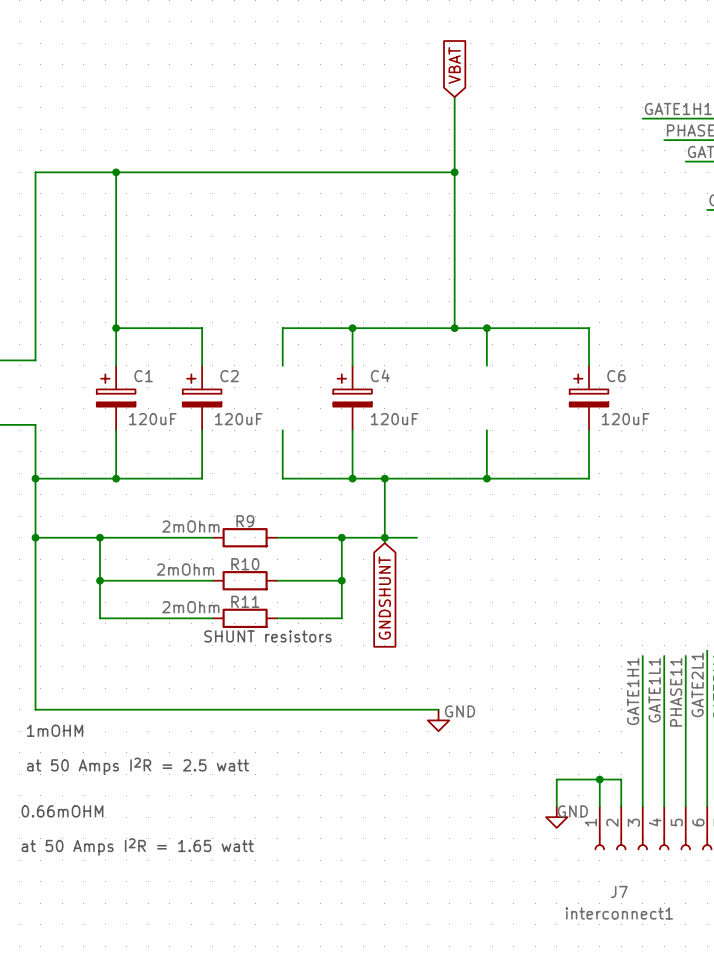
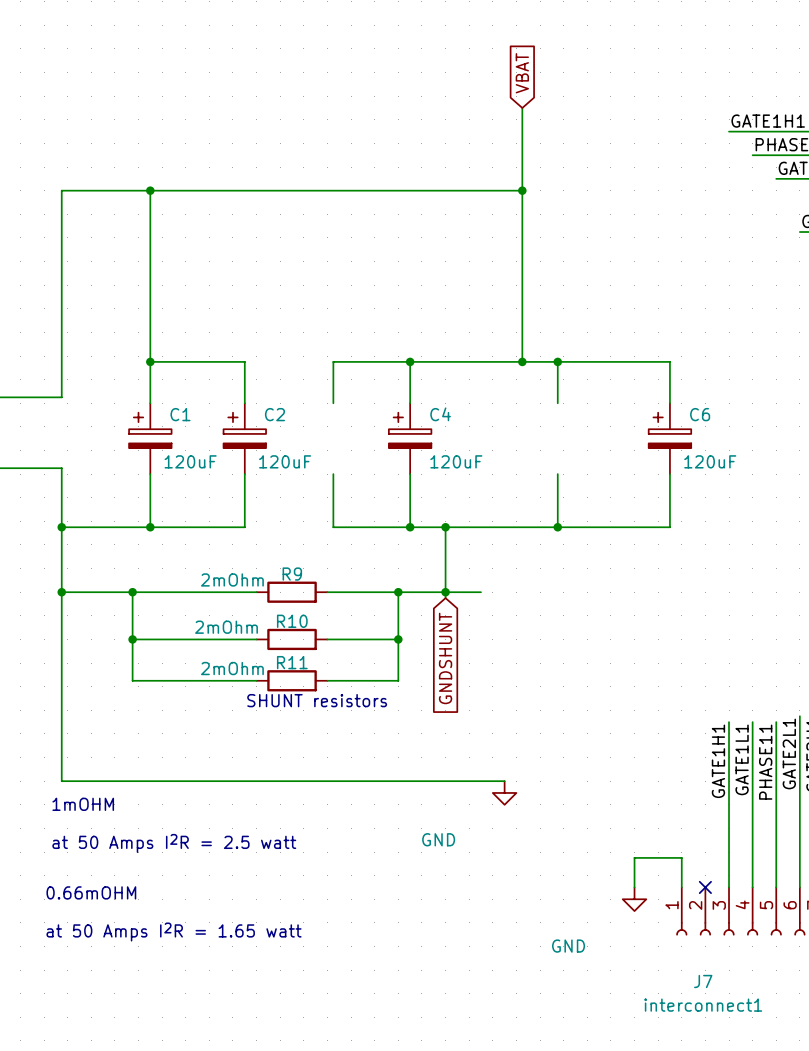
power symbol text position: GND (460, 711) -> GND (438, 839)
wire: (599, 779) (621, 779) (621, 806) -> none
junction: (599, 779) -> none
no-connect mark: none -> (705, 887)
power symbol text position: GND (572, 811) -> GND (568, 946)

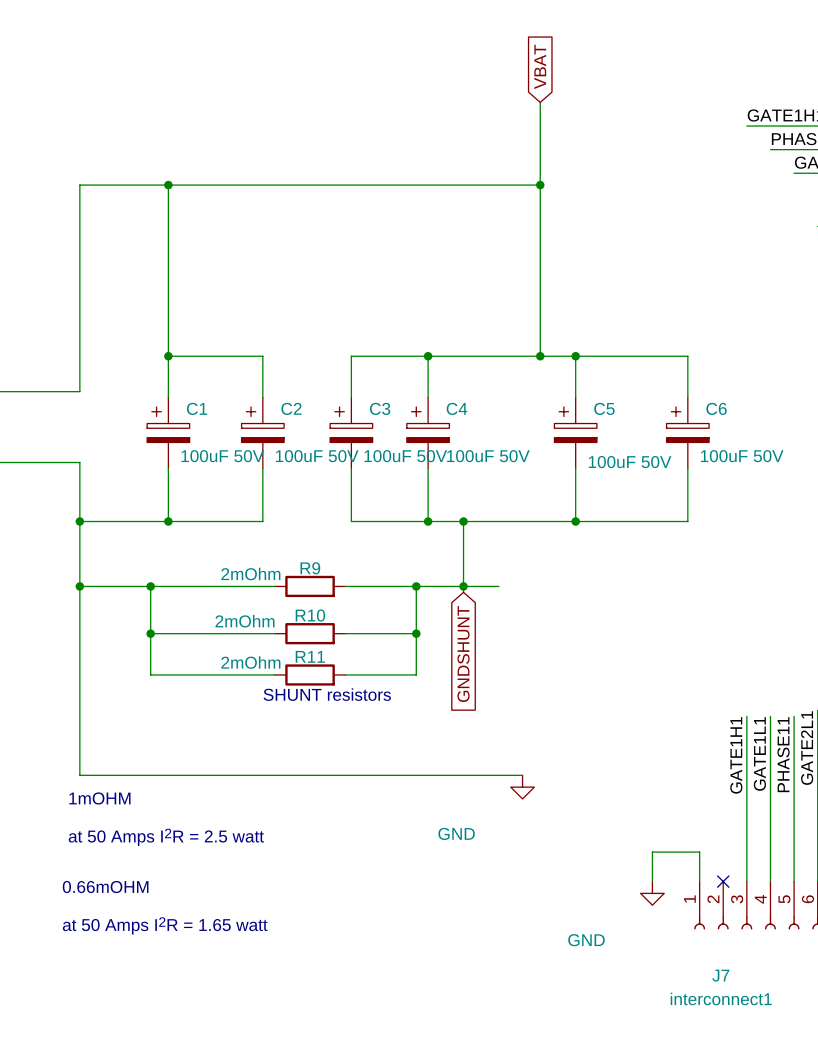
C3: none -> 100uF 50V (351, 432)
C5: none -> 100uF 50V (575, 432)
C1 value: 120uF (190, 461) -> 100uF 50V (222, 456)
C2 value: 120uF (285, 461) -> 100uF 50V (317, 456)
C4 value: 120uF (456, 461) -> 100uF 50V (488, 456)
C6 value: 120uF (710, 461) -> 100uF 50V (742, 456)

